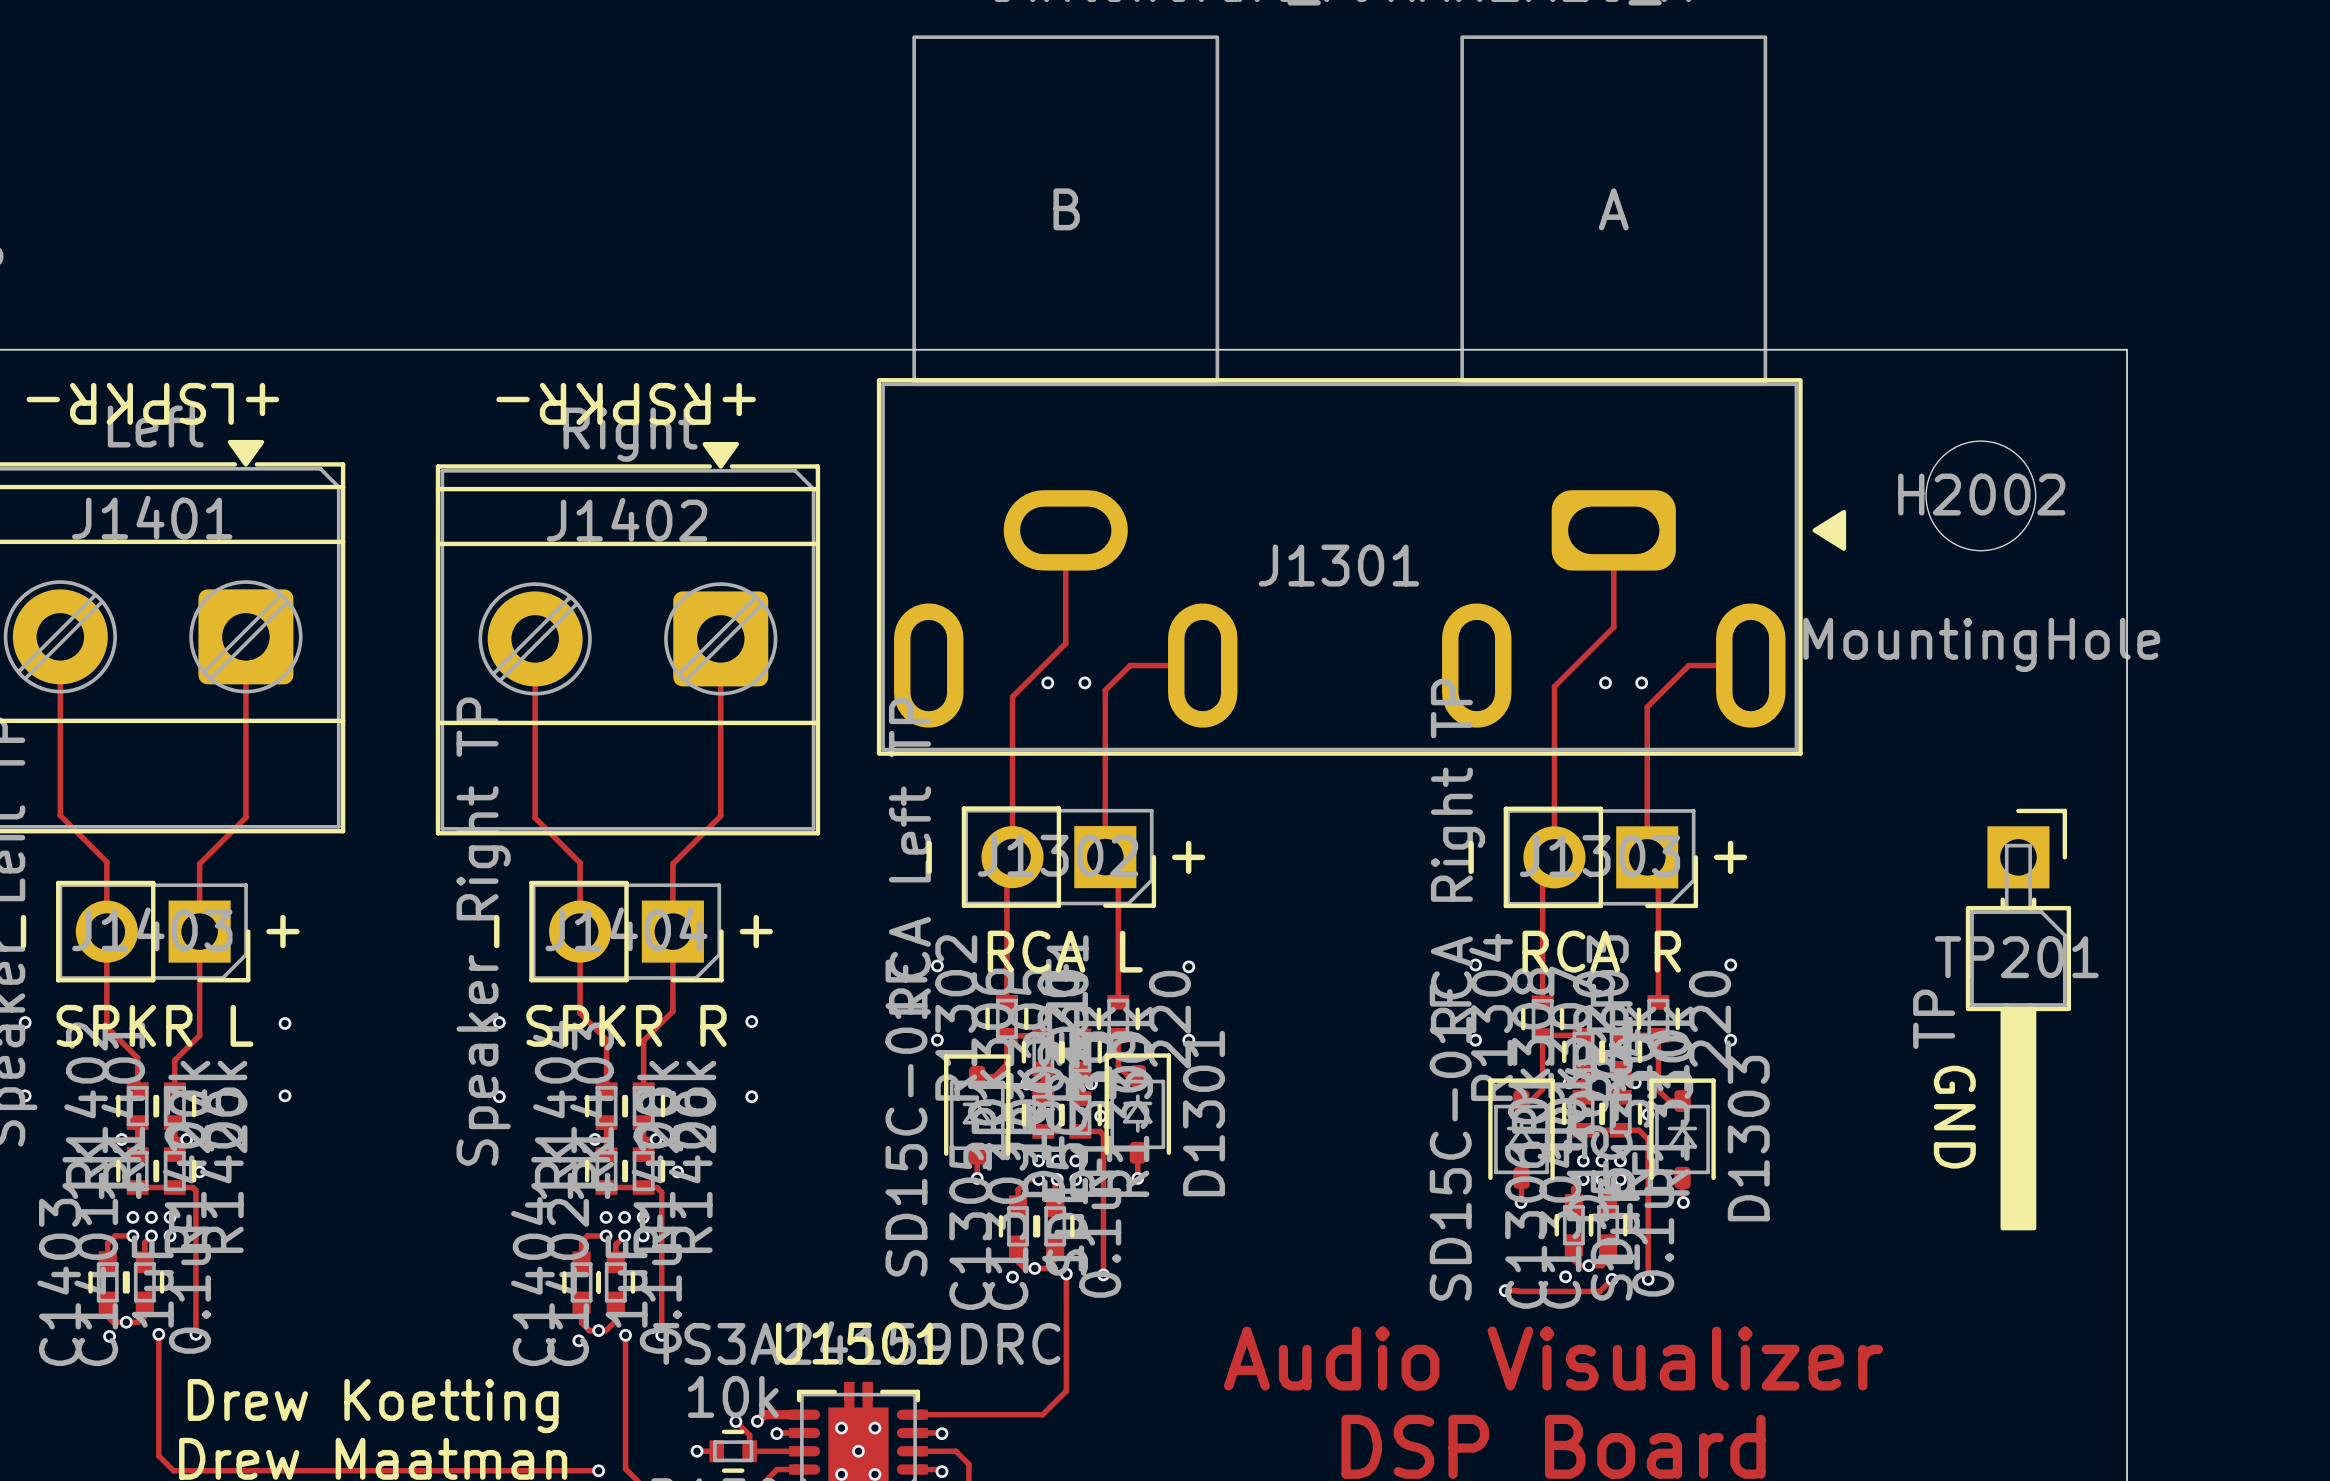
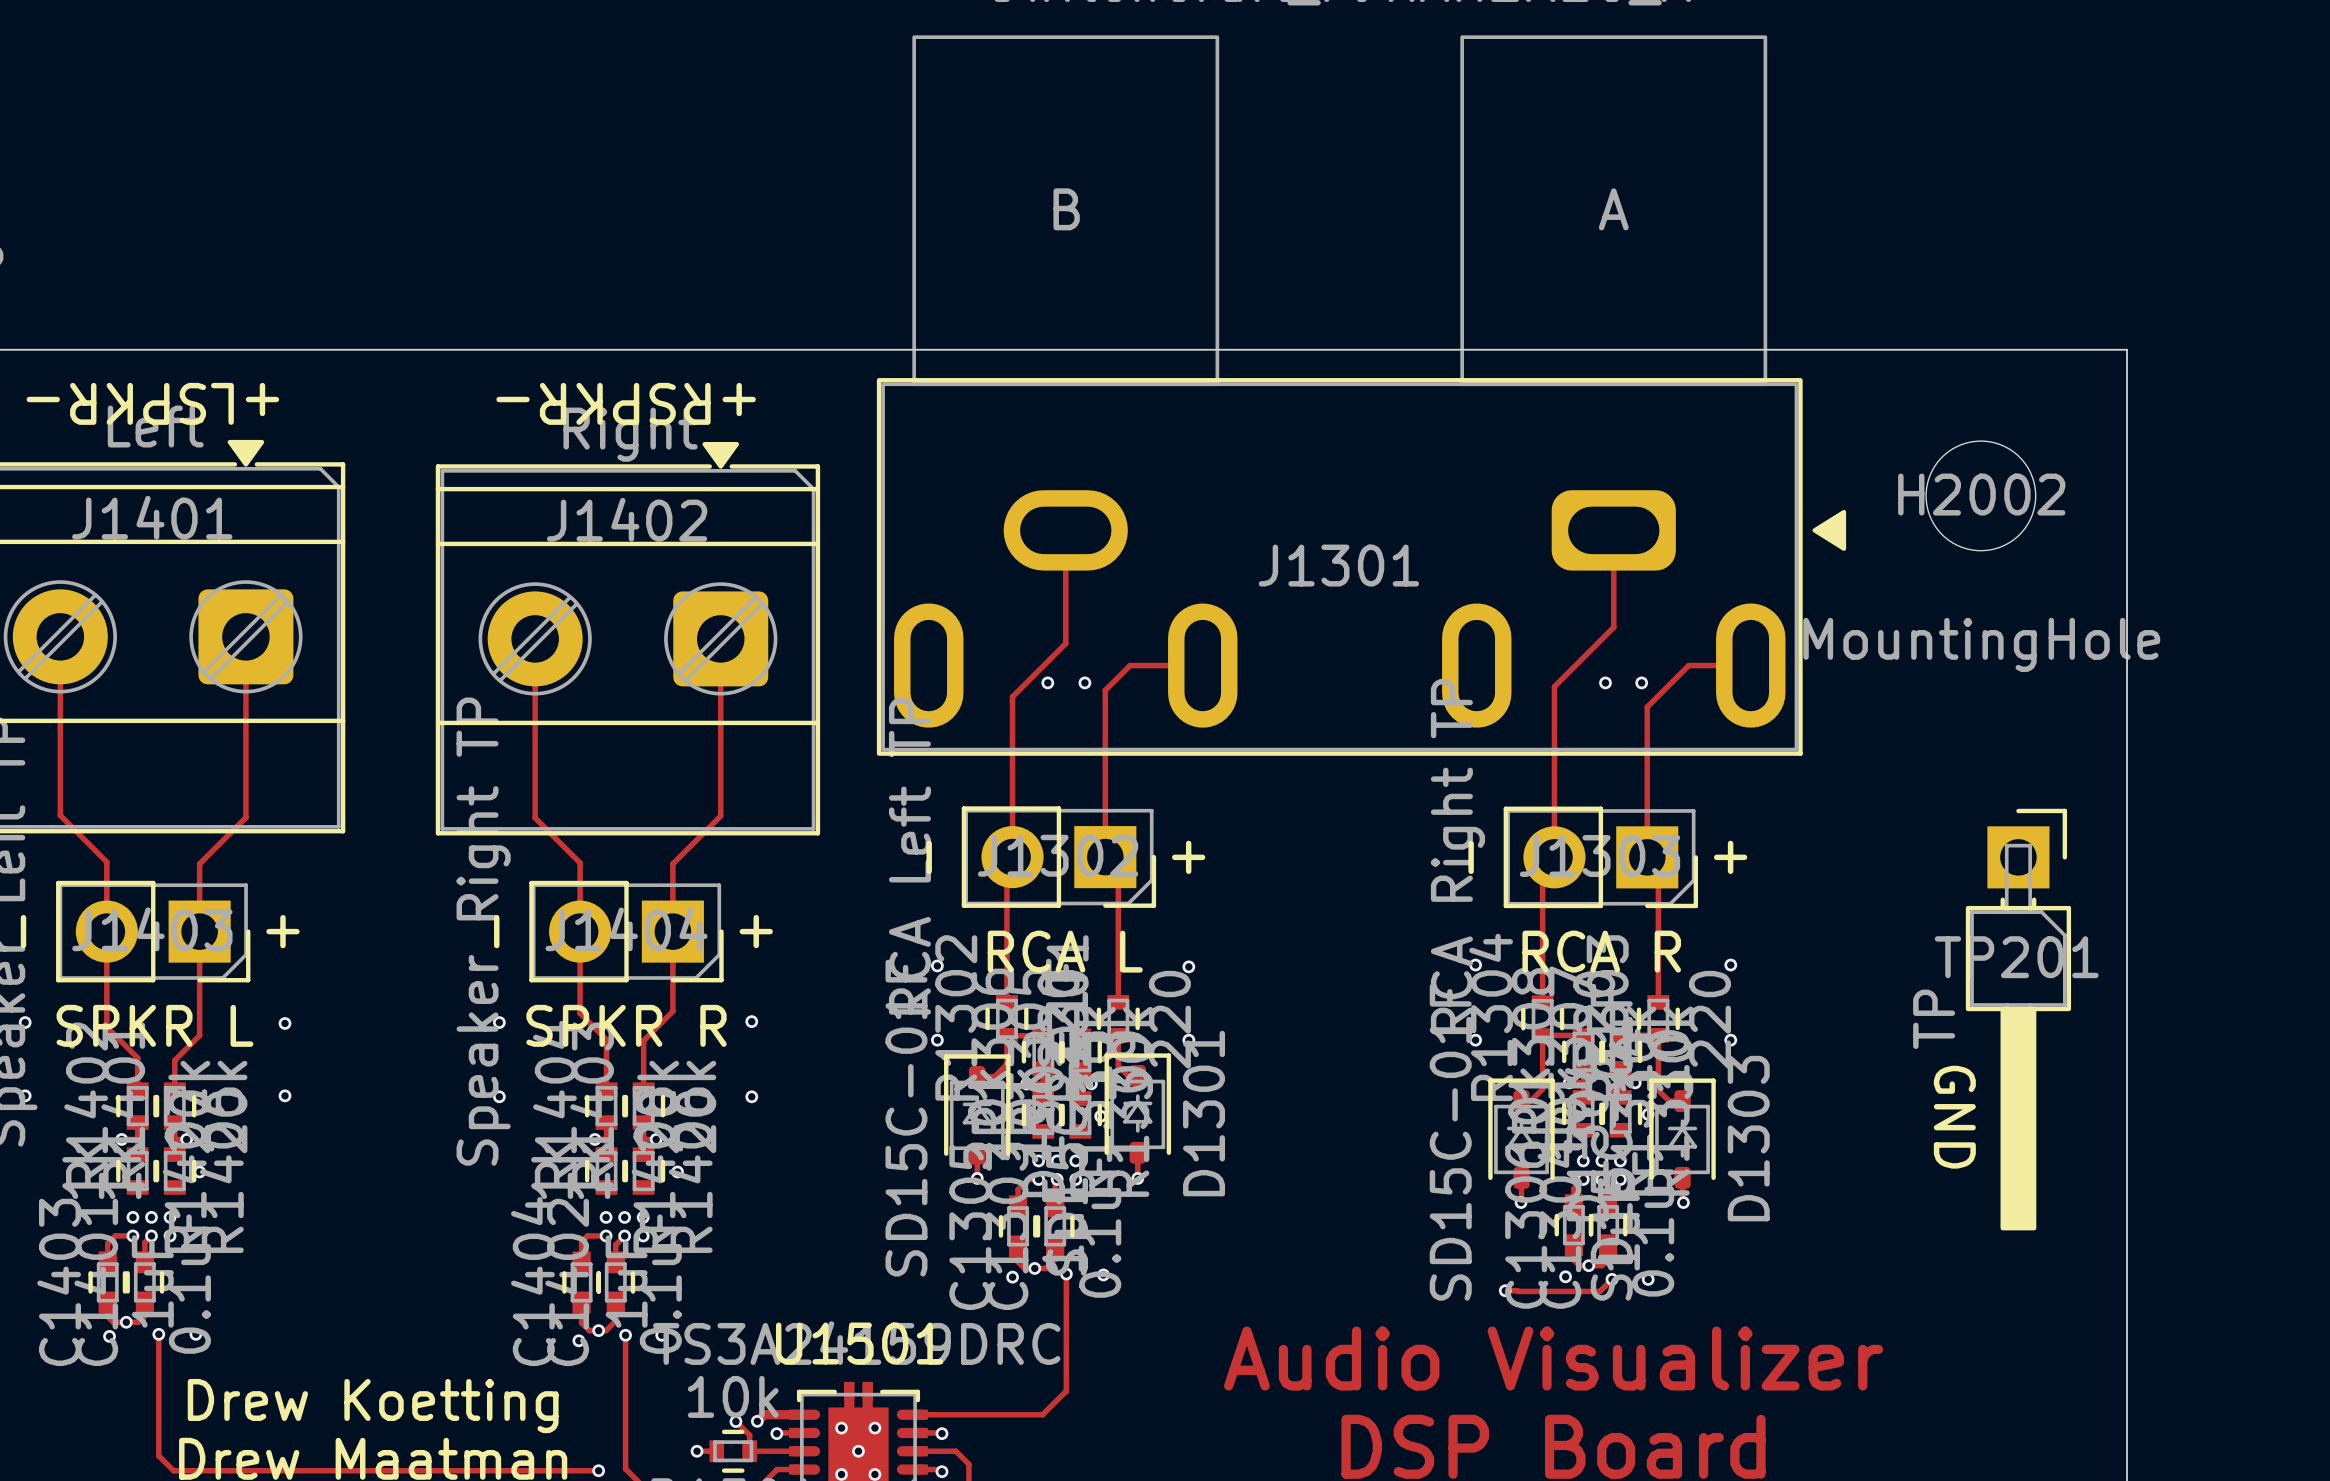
track: (1583, 1130) (1638, 1130) (1648, 1139) (1648, 1279) -> none
track: (1043, 1131) (1100, 1131) (1103, 1134) (1103, 1274) -> none
track: (137, 1187) (192, 1187) (195, 1190) (195, 1334) -> none
track: (606, 1187) (656, 1187) (661, 1192) (661, 1335) -> none

